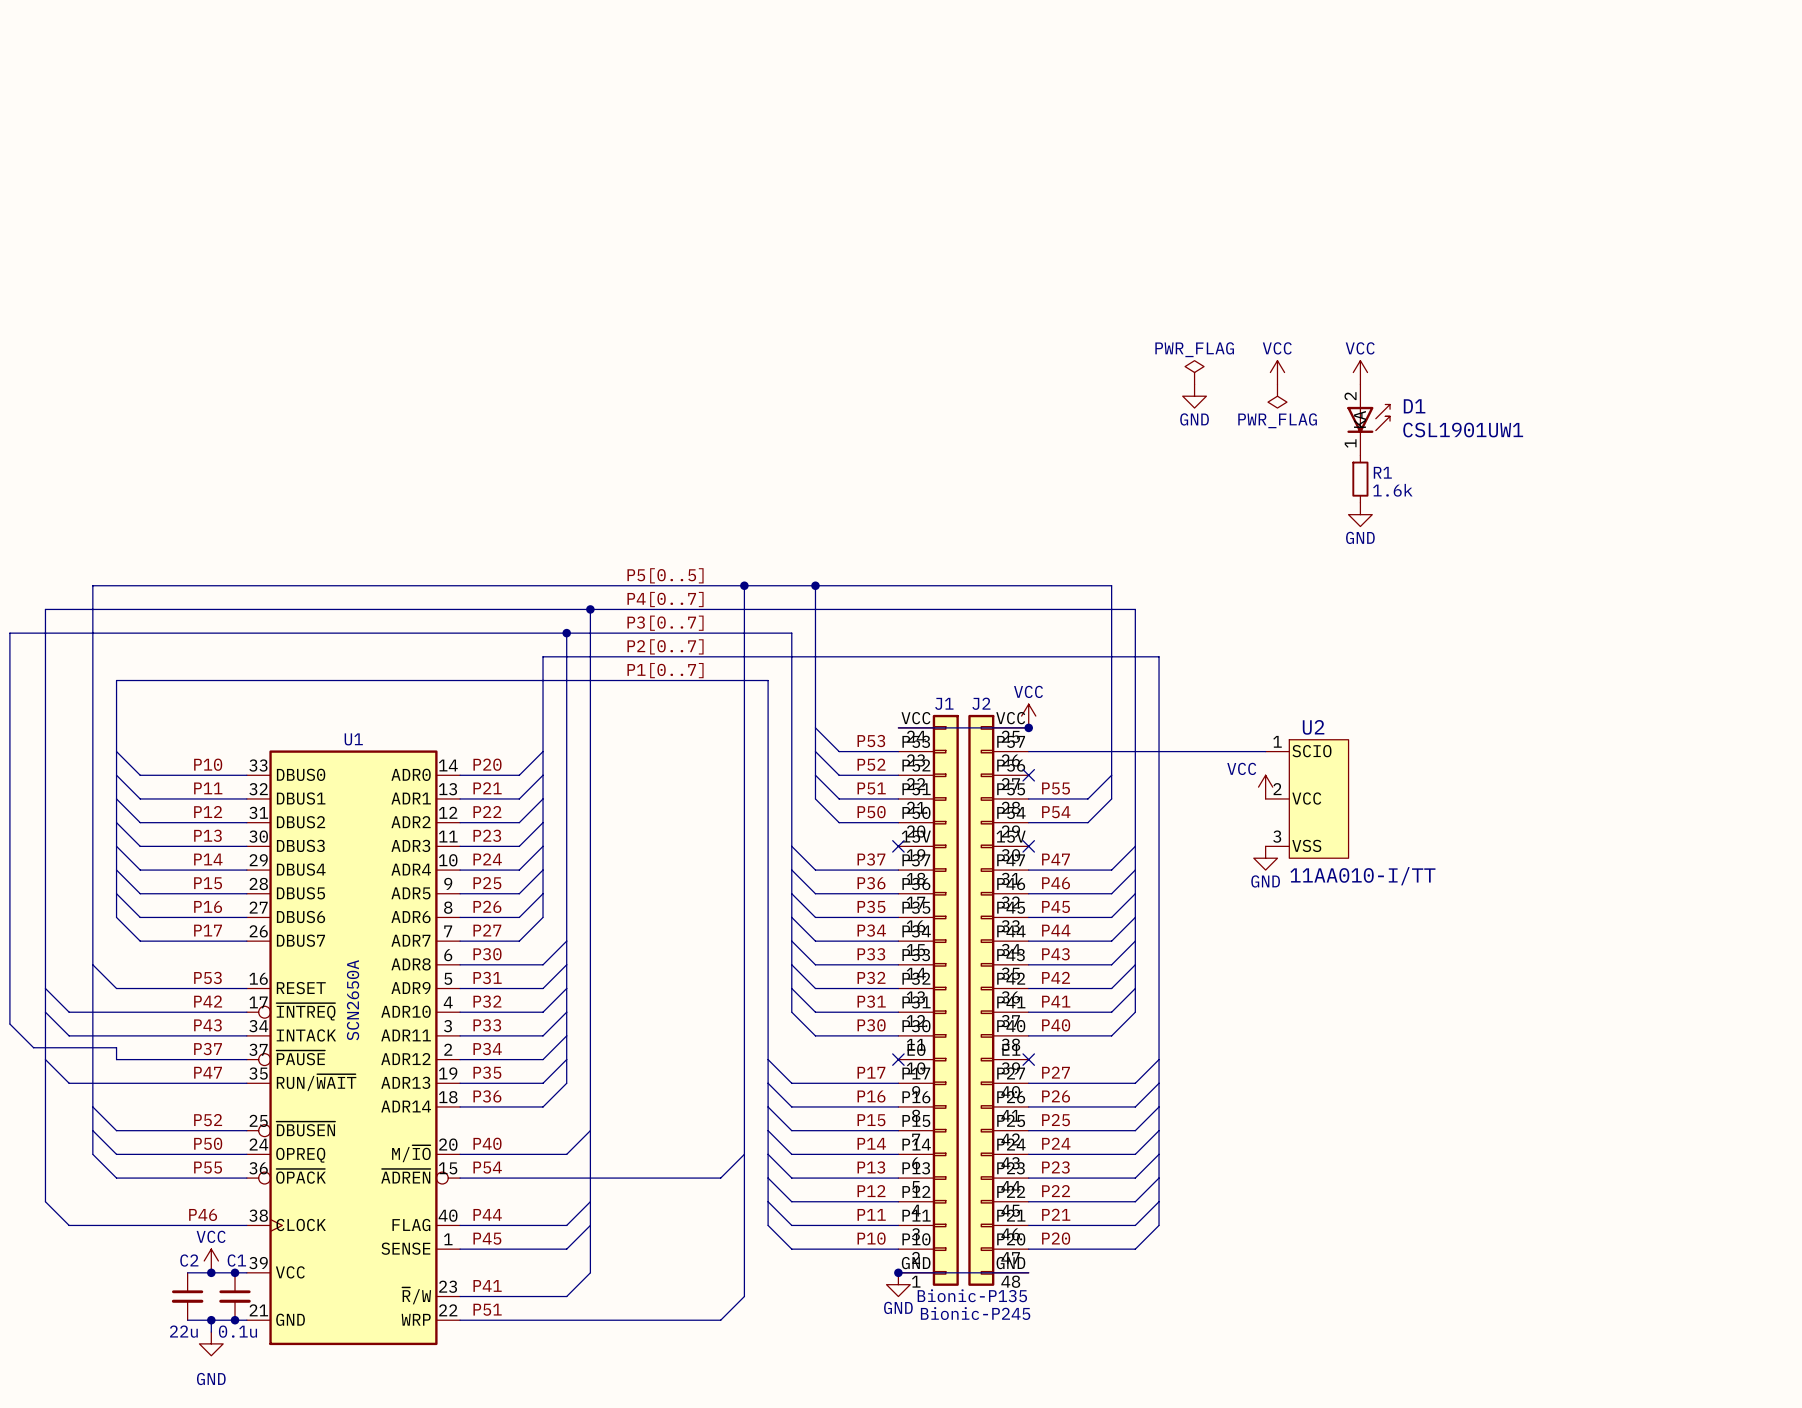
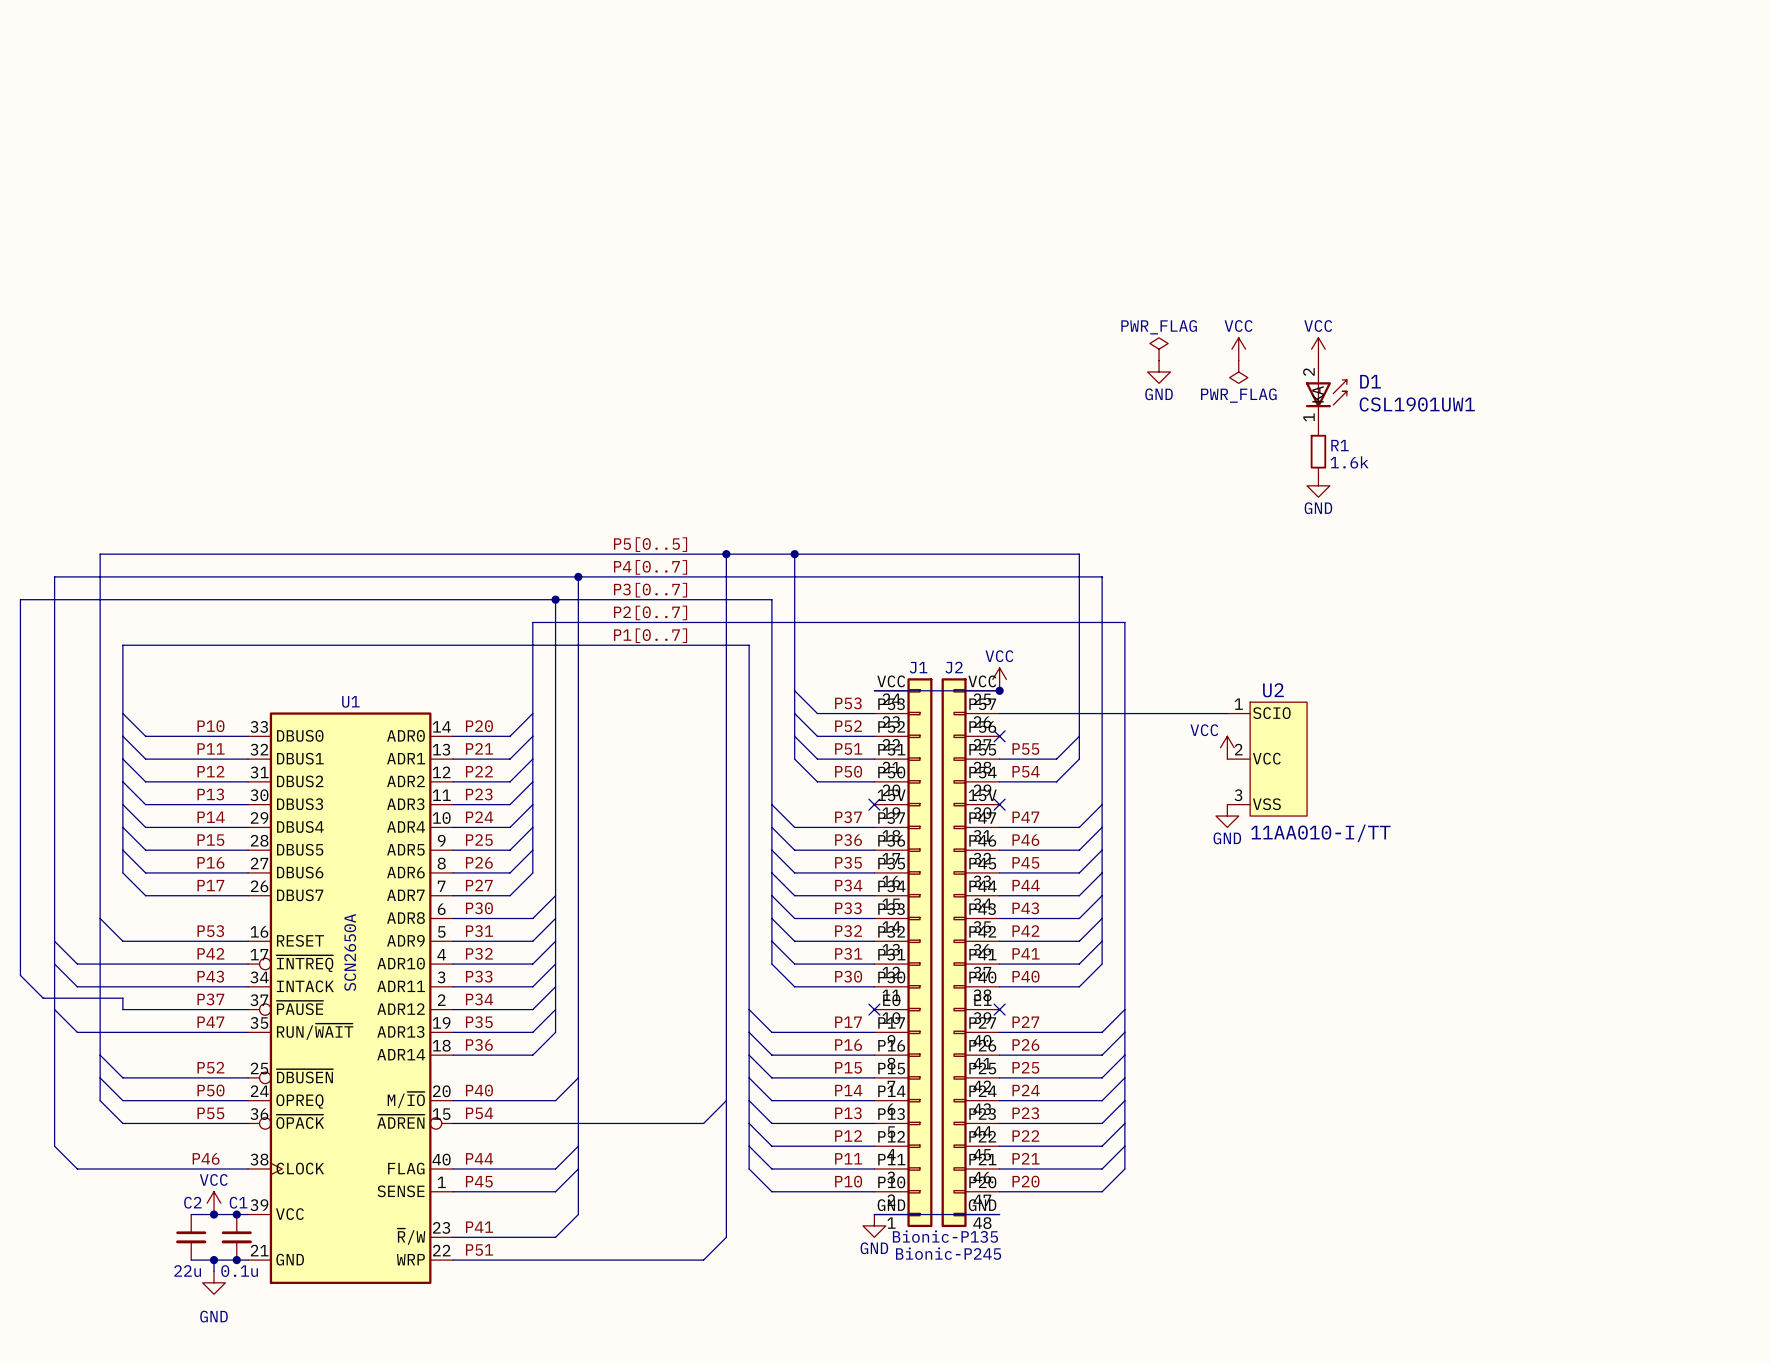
junction: (898, 1272) -> none

